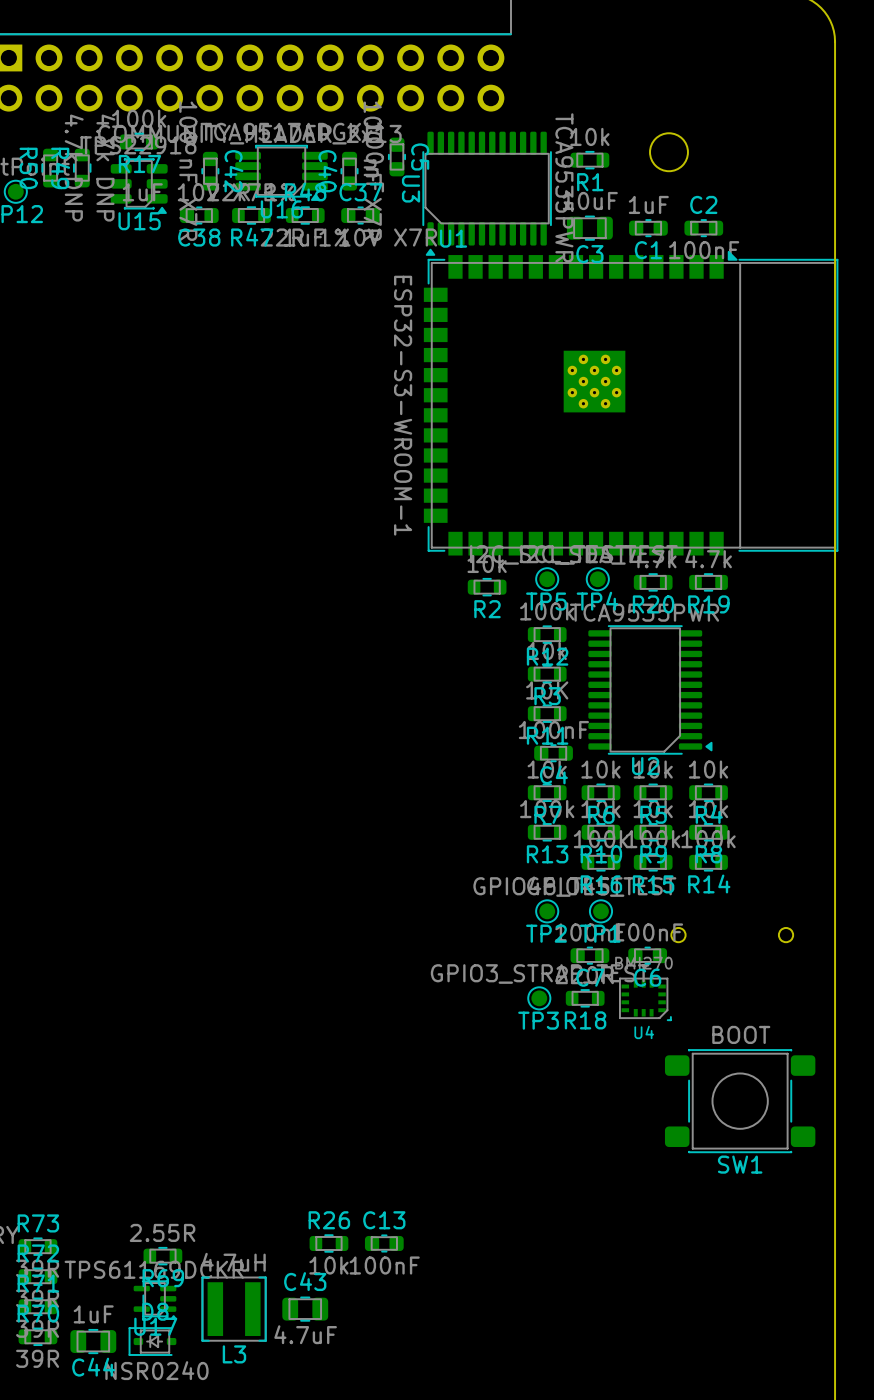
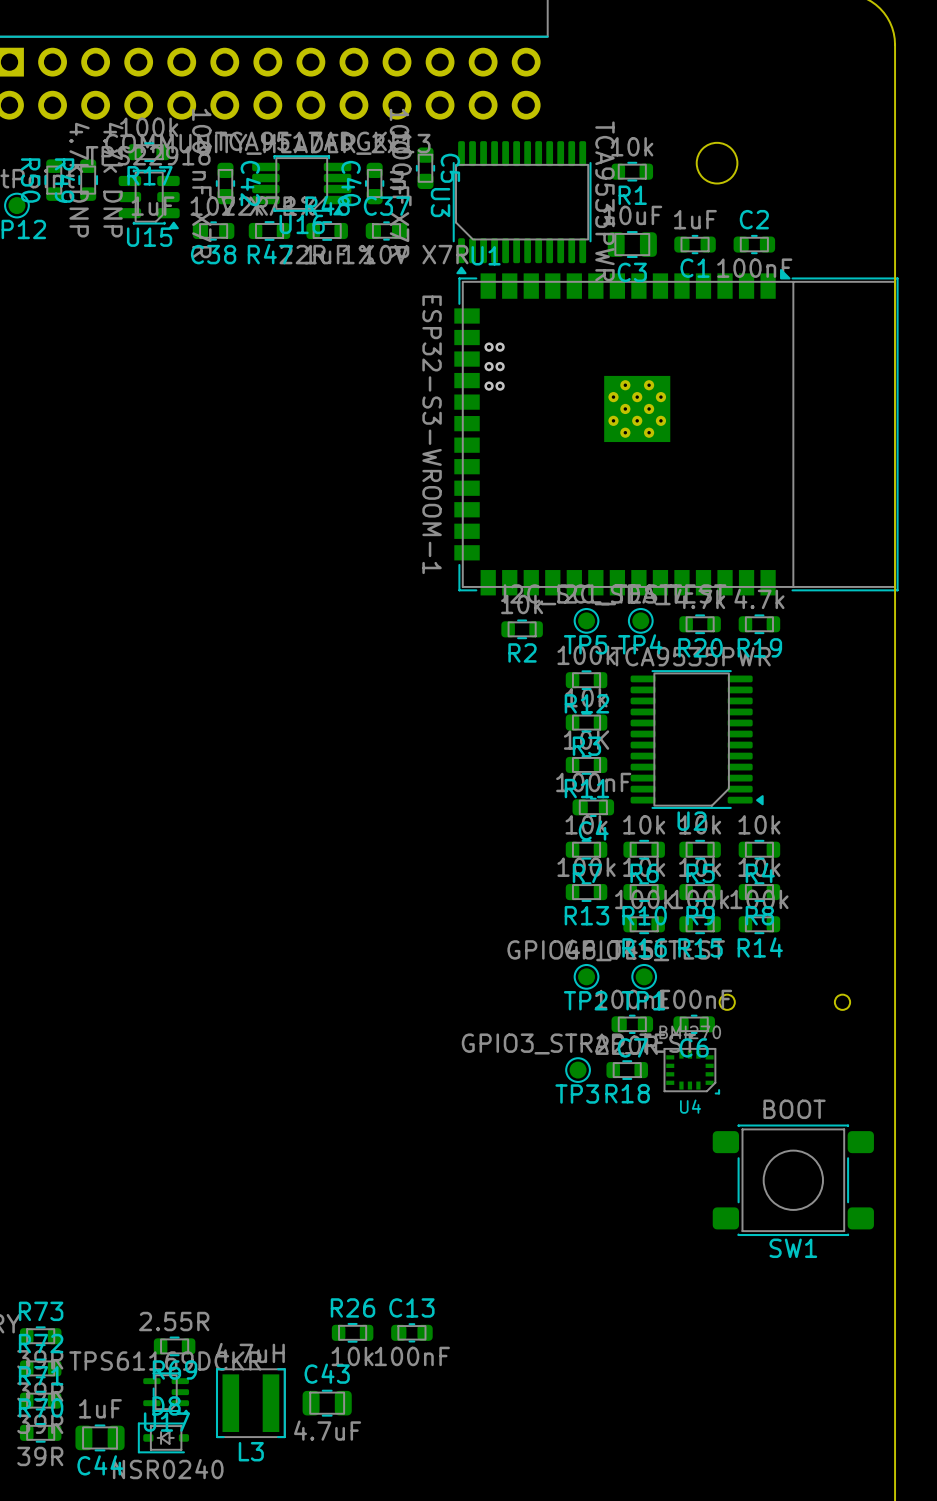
via: none -> (489, 347)
via: none -> (500, 347)
via: none -> (489, 366)
via: none -> (500, 366)
via: none -> (489, 386)
via: none -> (500, 386)

